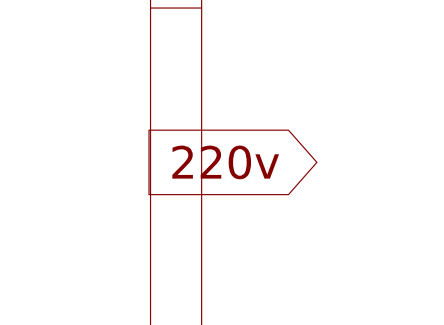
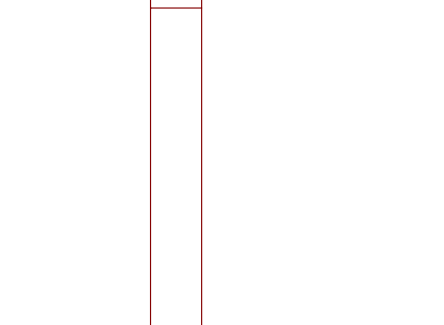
global label: 220v (225, 162) -> none

